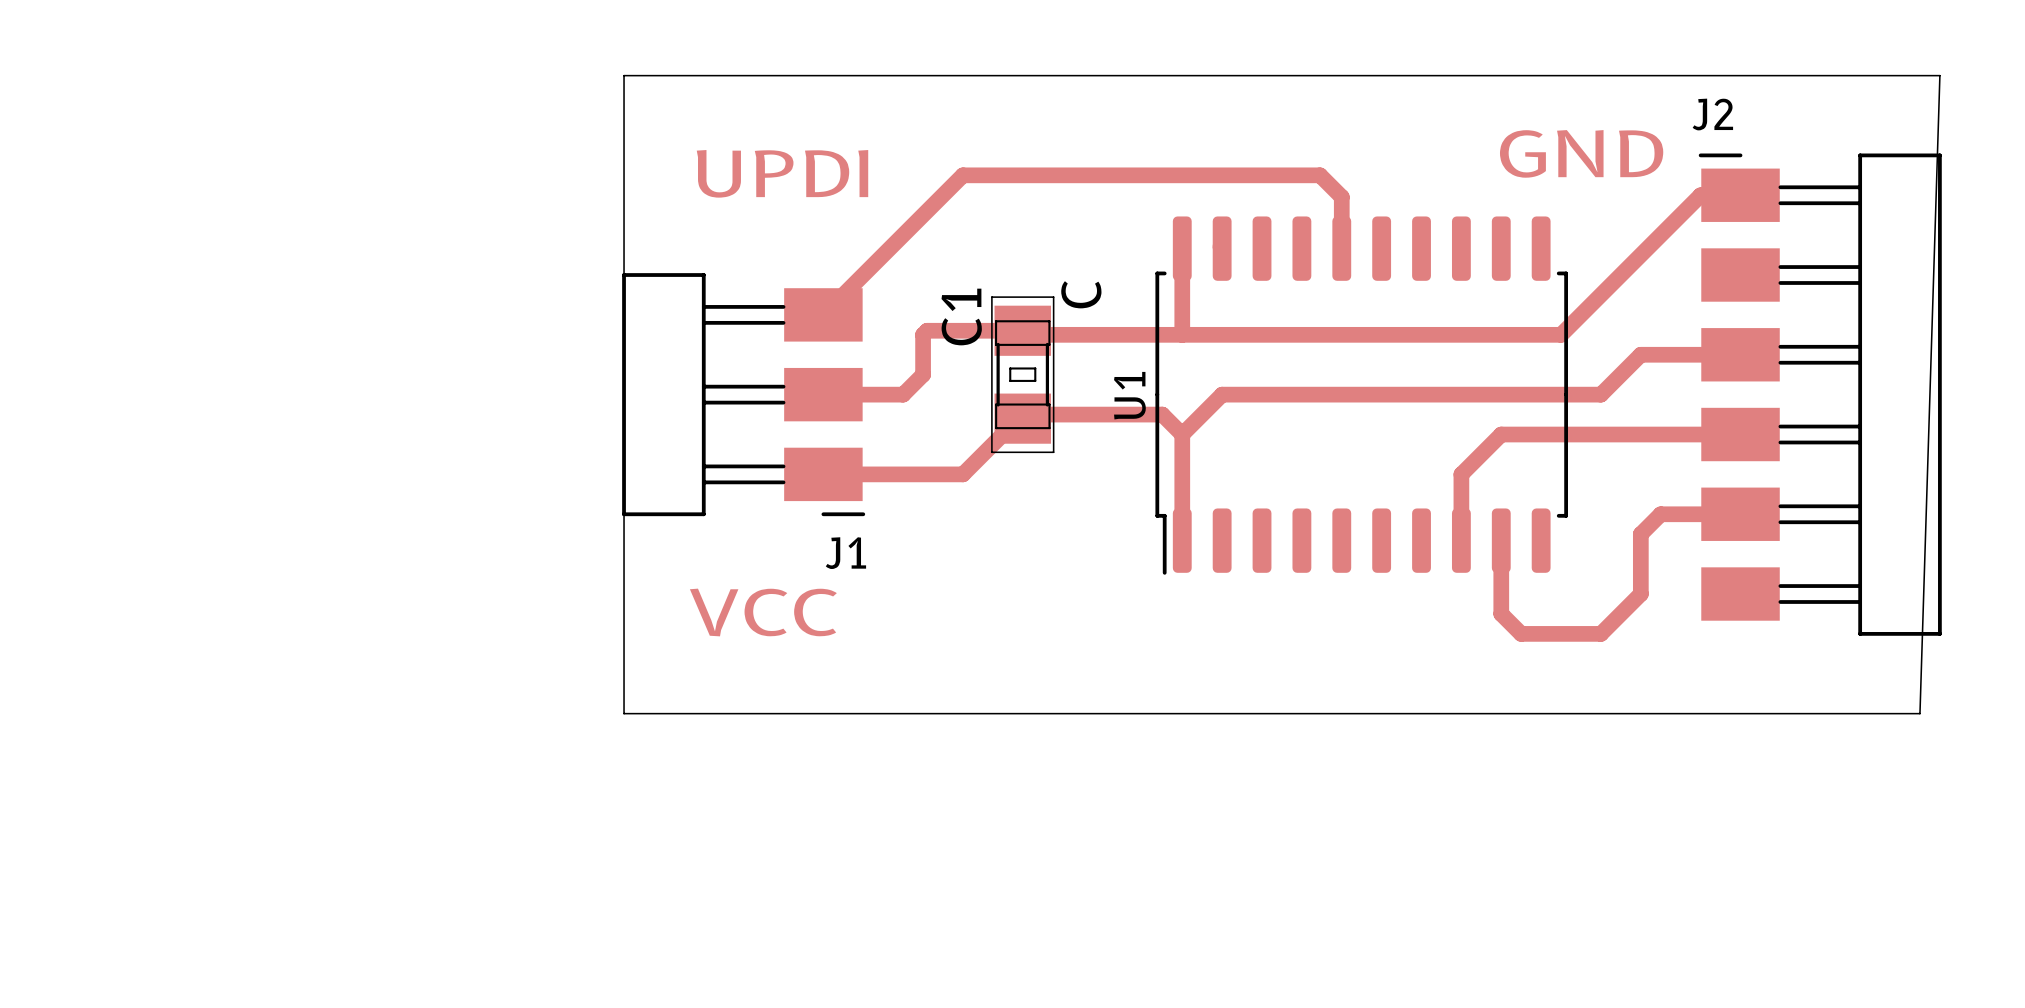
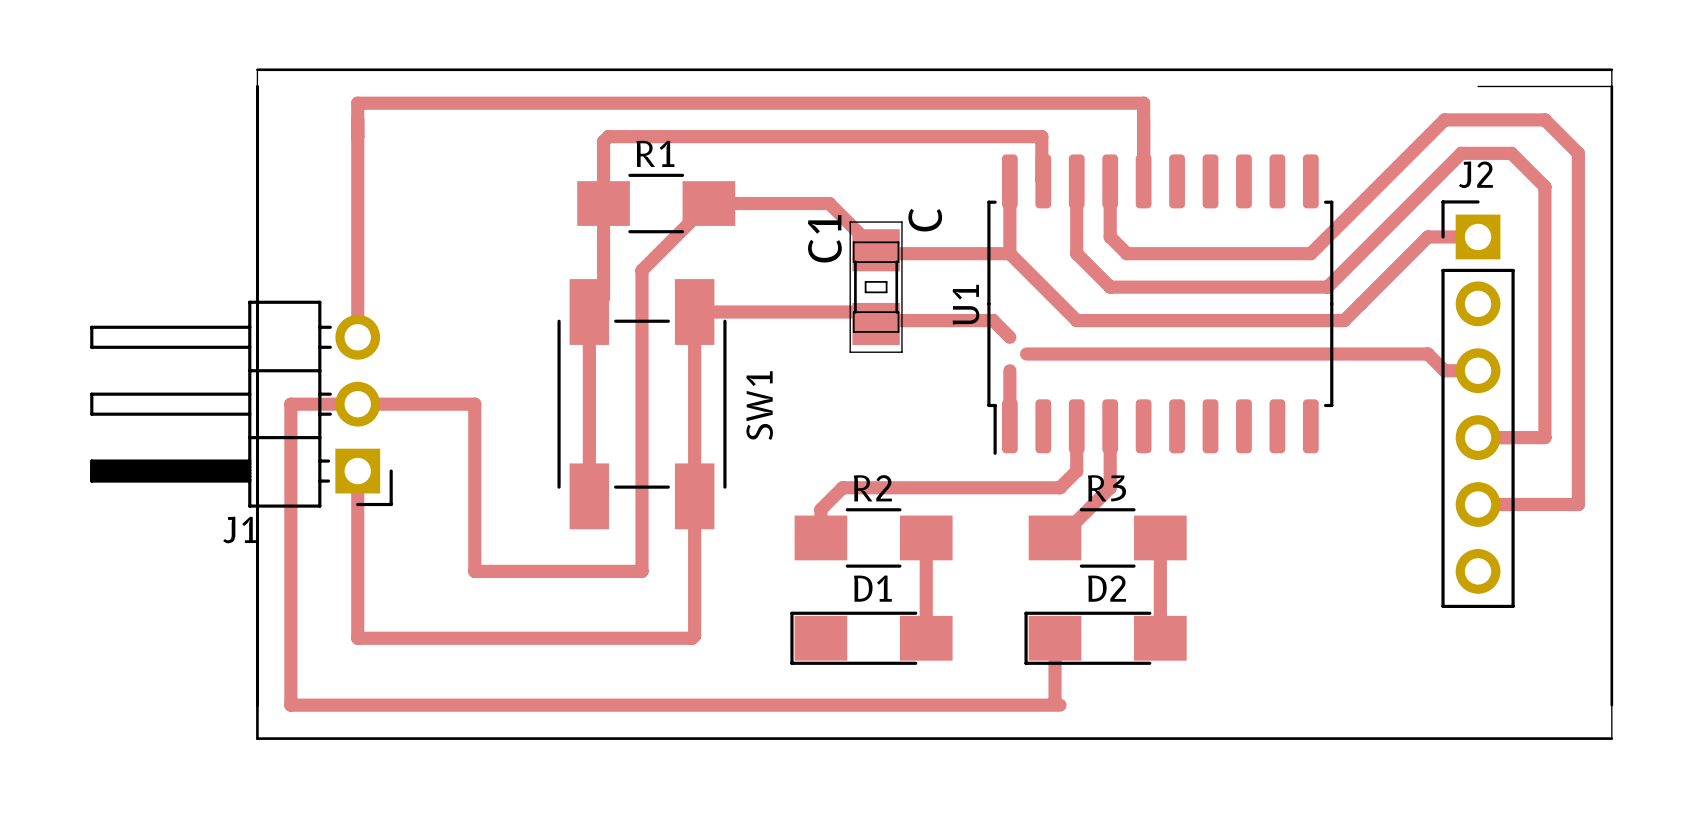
board edge: (624, 75) (1939, 75) (1919, 713) (624, 713) (624, 75) -> (1611, 86) (1611, 69) (257, 69) (257, 738) (1611, 738) (1611, 86)
J2 name position: J2 (1712, 114) -> J2 (1475, 174)
board edge: none -> (1478, 86) (1611, 86)
text: GND (1581, 153) -> none
J2 footprint: [1698, 153, 1942, 636] -> [1441, 200, 1515, 608]
text: UPDI (782, 173) -> none
track: (1740, 195) (1700, 195) (1561, 334) (1541, 334) -> (1478, 504) (1578, 504) (1578, 153) (1544, 119) (1444, 119) (1310, 253)
track: (1341, 197) (1320, 175) (962, 175) (823, 314) -> (1143, 138) (1143, 103) (357, 103) (357, 337)
track: none -> (1041, 179) (1041, 136) (608, 136) (603, 141) (603, 297) (589, 312) (589, 496)
track: none -> (1076, 181) (1076, 253) (1110, 287) (1327, 287) (1461, 153) (1511, 153) (1544, 186) (1544, 437) (1478, 437)
J1 footprint: [622, 273, 866, 517] -> [90, 300, 393, 508]
R1: none -> (656, 203)
track: (1022, 330) (927, 330) (923, 334) (923, 374) (903, 394) (823, 394) -> (876, 250) (829, 203) (708, 203) (642, 270) (642, 571) (474, 571) (474, 404) (290, 404) (290, 705) (1060, 705)
track: (1182, 334) (1321, 334) -> (1110, 181) (1110, 236) (1126, 253)
track: (1640, 354) (1740, 354) -> (1394, 270) (1427, 236) (1478, 236)
track: (1600, 394) (1222, 394) (1182, 434) (1182, 474) -> (1361, 303) (1344, 320) (1076, 320) (1009, 253)
track: none -> (864, 312) (694, 312) (694, 635) (692, 638)
track: (1022, 418) (1018, 418) (962, 474) (823, 474) -> none
track: (1740, 434) (1501, 434) (1461, 474) (1461, 540) -> none
track: none -> (1026, 354) (1427, 354) (1444, 370) (1478, 370)
SW1: none -> (642, 404)
track: (1740, 514) (1660, 514) (1640, 534) (1640, 594) (1600, 633) (1521, 633) (1501, 613) (1501, 540) -> none
track: none -> (1076, 426) (1076, 471) (1060, 487) (842, 487) (820, 509) (820, 537)
track: none -> (1110, 426) (1110, 487) (1060, 537) (1055, 537)
J1 name position: J1 (845, 553) -> J1 (240, 530)
track: none -> (357, 471) (357, 638) (692, 638)
text: VCC (763, 612) -> none
R2: none -> (873, 537)
track: none -> (926, 537) (926, 638)
R3: none -> (1107, 537)
track: none -> (1160, 537) (1160, 638)
D1: none -> (871, 638)
track: none -> (1055, 638) (1055, 700)
D2: none -> (1105, 638)

